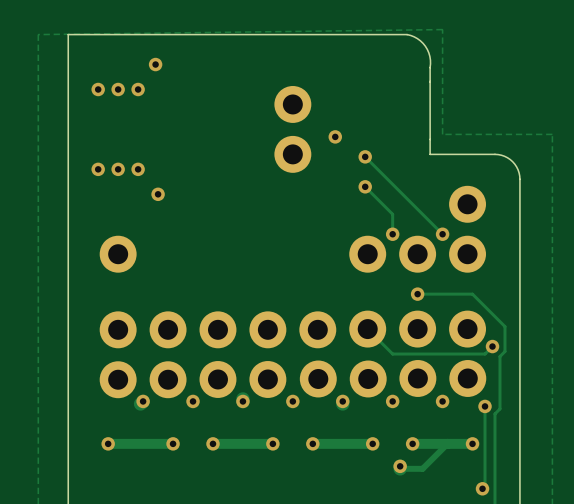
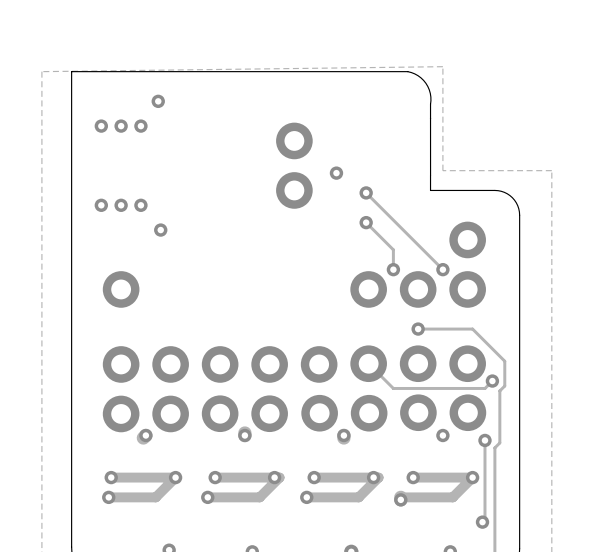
via: (193, 401) -> none
via: (292, 401) -> none
via: (392, 401) -> none
track: none -> (175, 477) (155, 497) (108, 497)
track: none -> (274, 477) (279, 477) (259, 497) (207, 497)
track: none -> (373, 477) (378, 477) (358, 497) (306, 497)
track: (447, 443) (422, 468) (400, 468) (400, 466) -> (472, 477) (452, 497) (400, 497) (400, 499)
via: none -> (108, 497)
via: none -> (207, 497)
via: none -> (306, 497)

